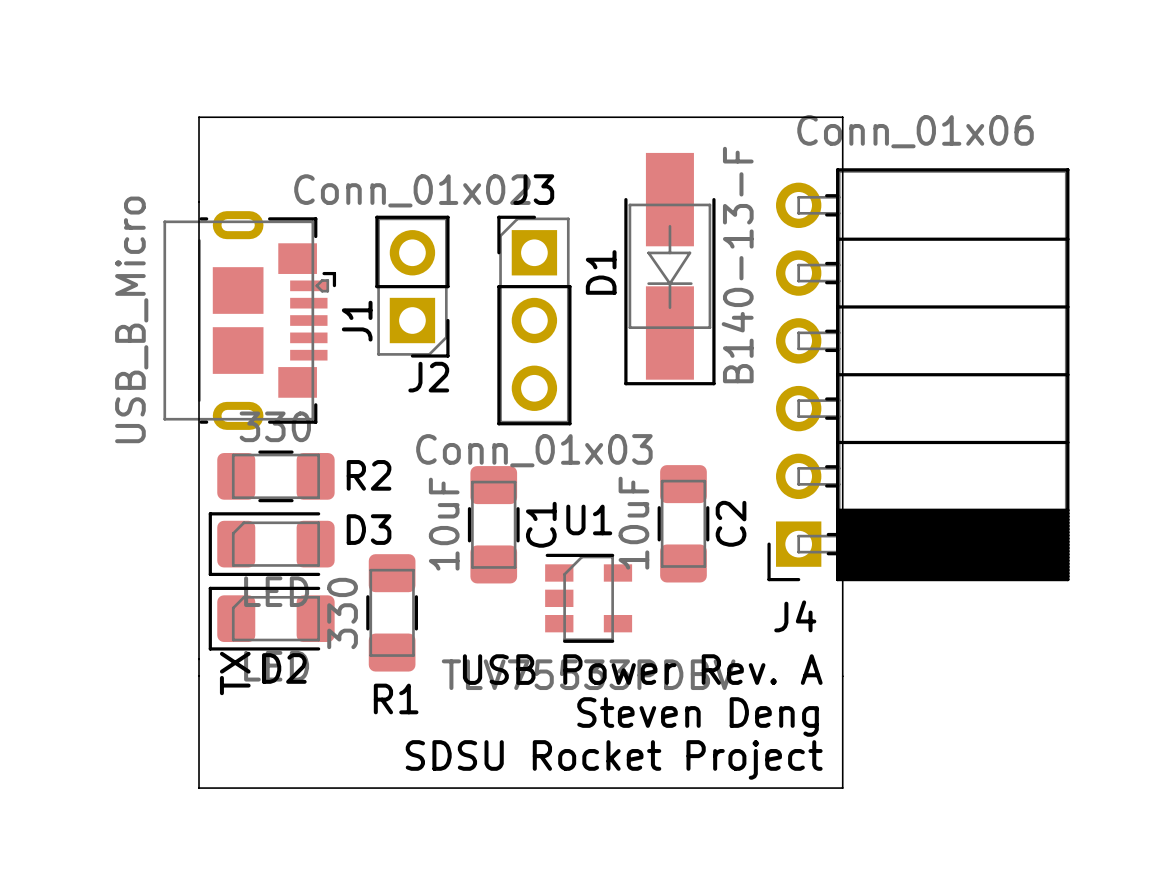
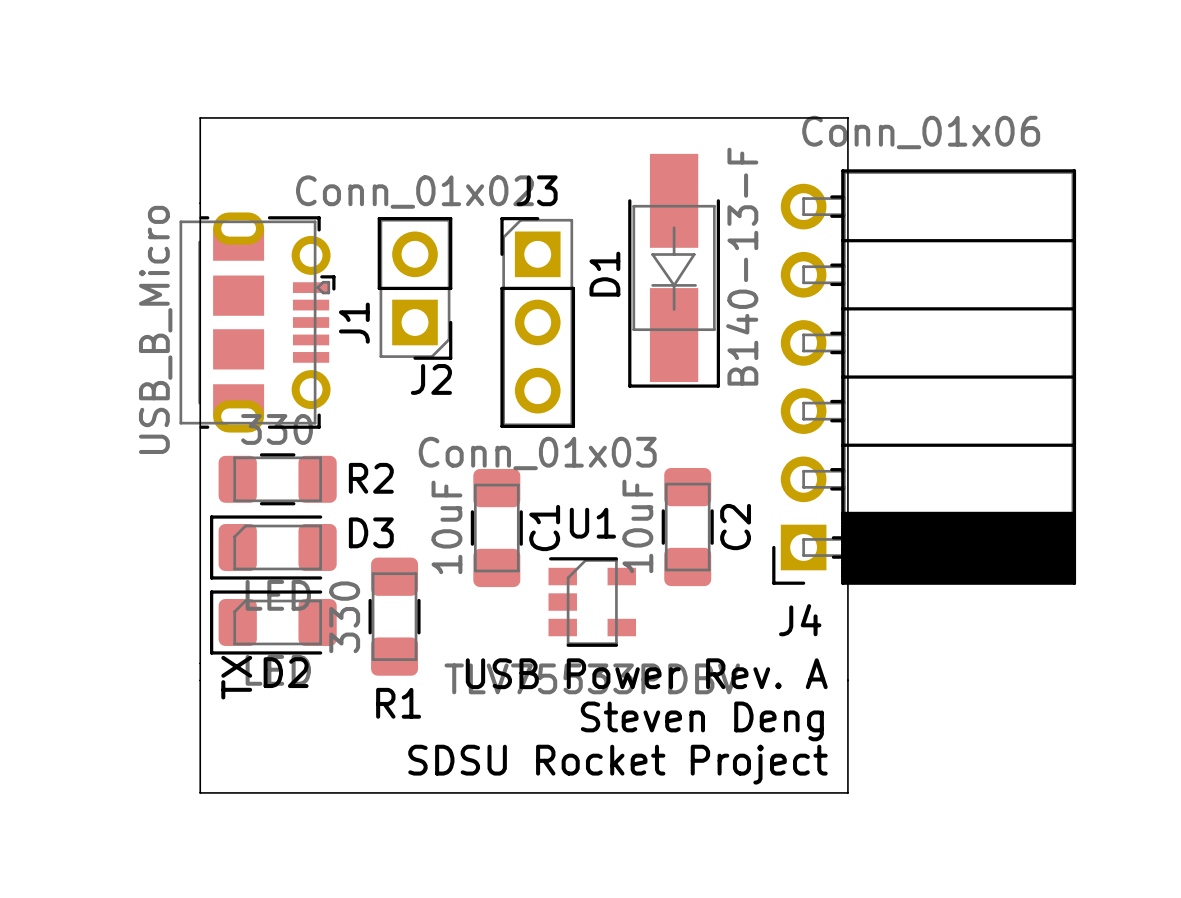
J1 footprint: [163, 211, 337, 430] -> [179, 212, 336, 433]

